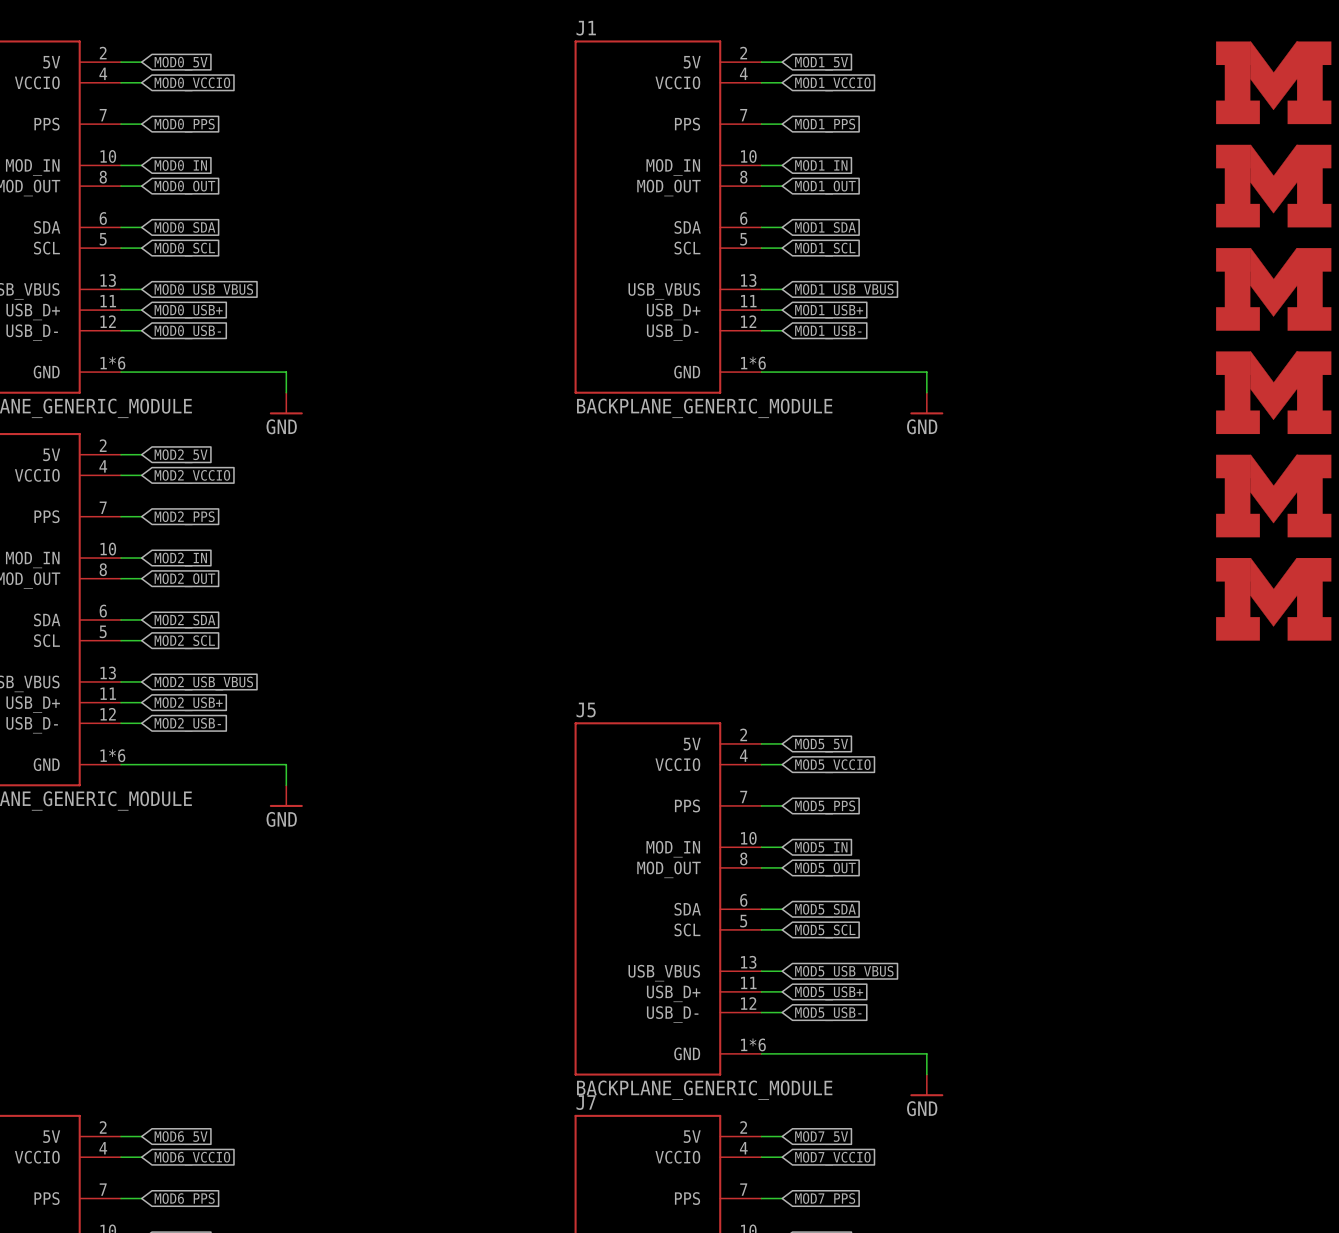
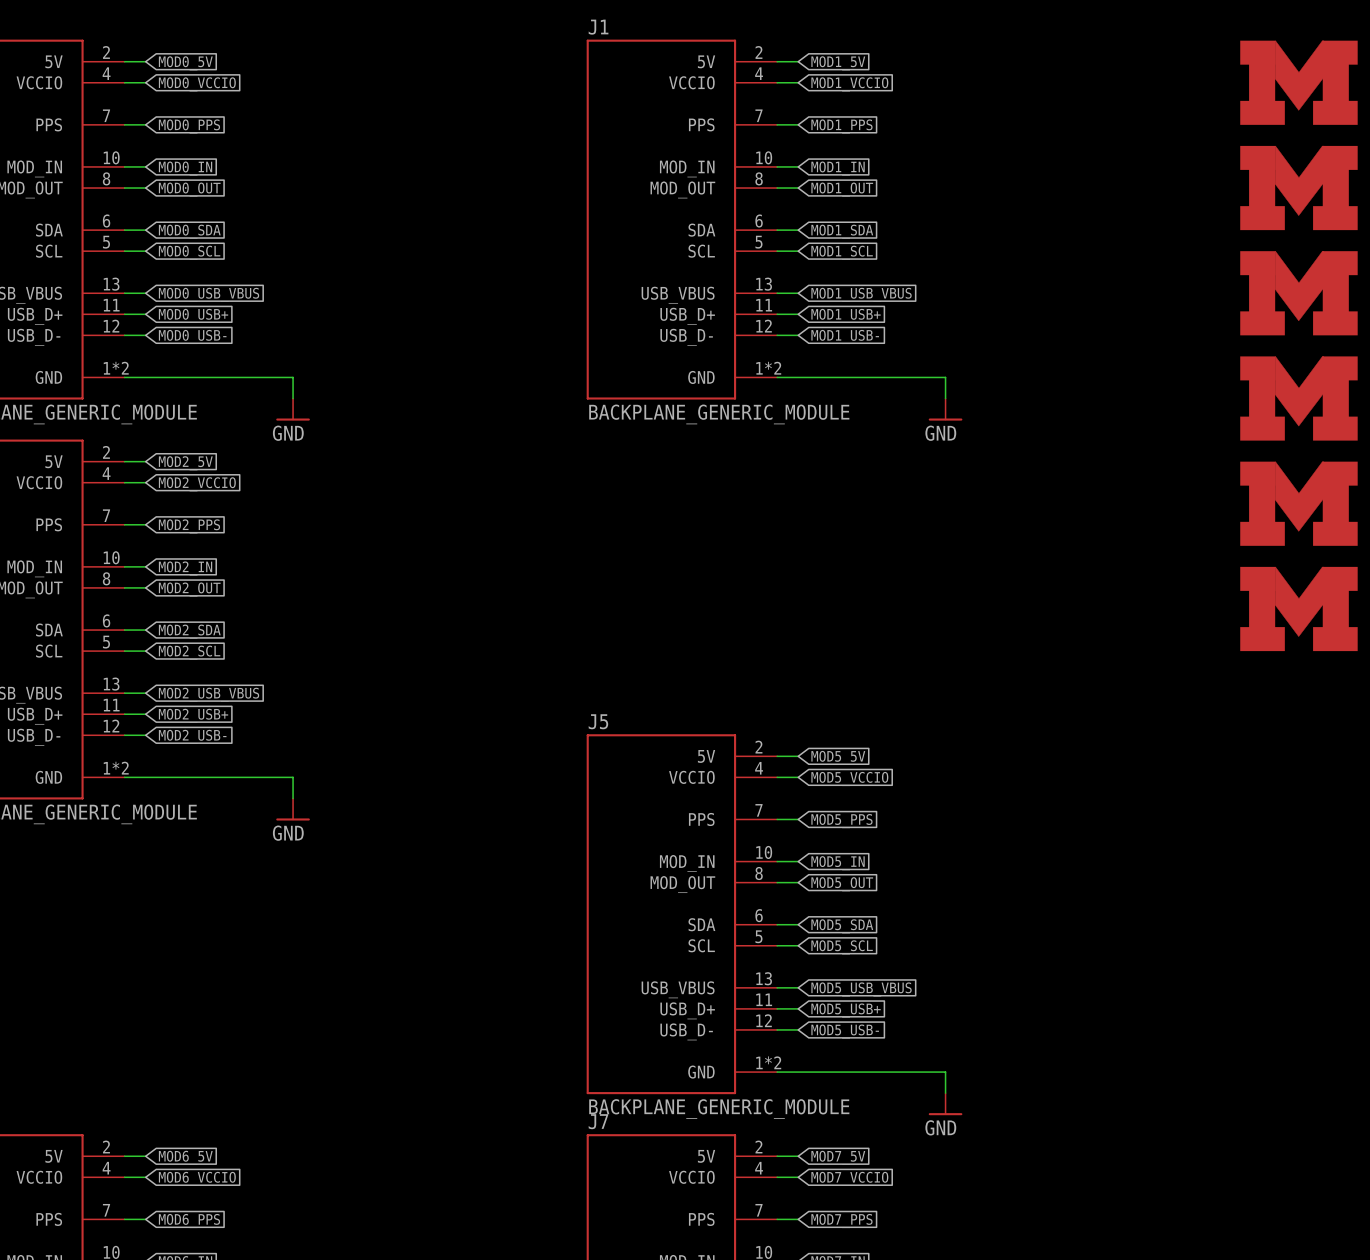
part pin number: 1*6 (112, 363) -> 1*2 (116, 368)
J1 pin number: 1*6 (753, 363) -> 1*2 (768, 368)
part pin number: 1*6 (112, 755) -> 1*2 (116, 768)
J5 pin number: 1*6 (753, 1044) -> 1*2 (768, 1062)

